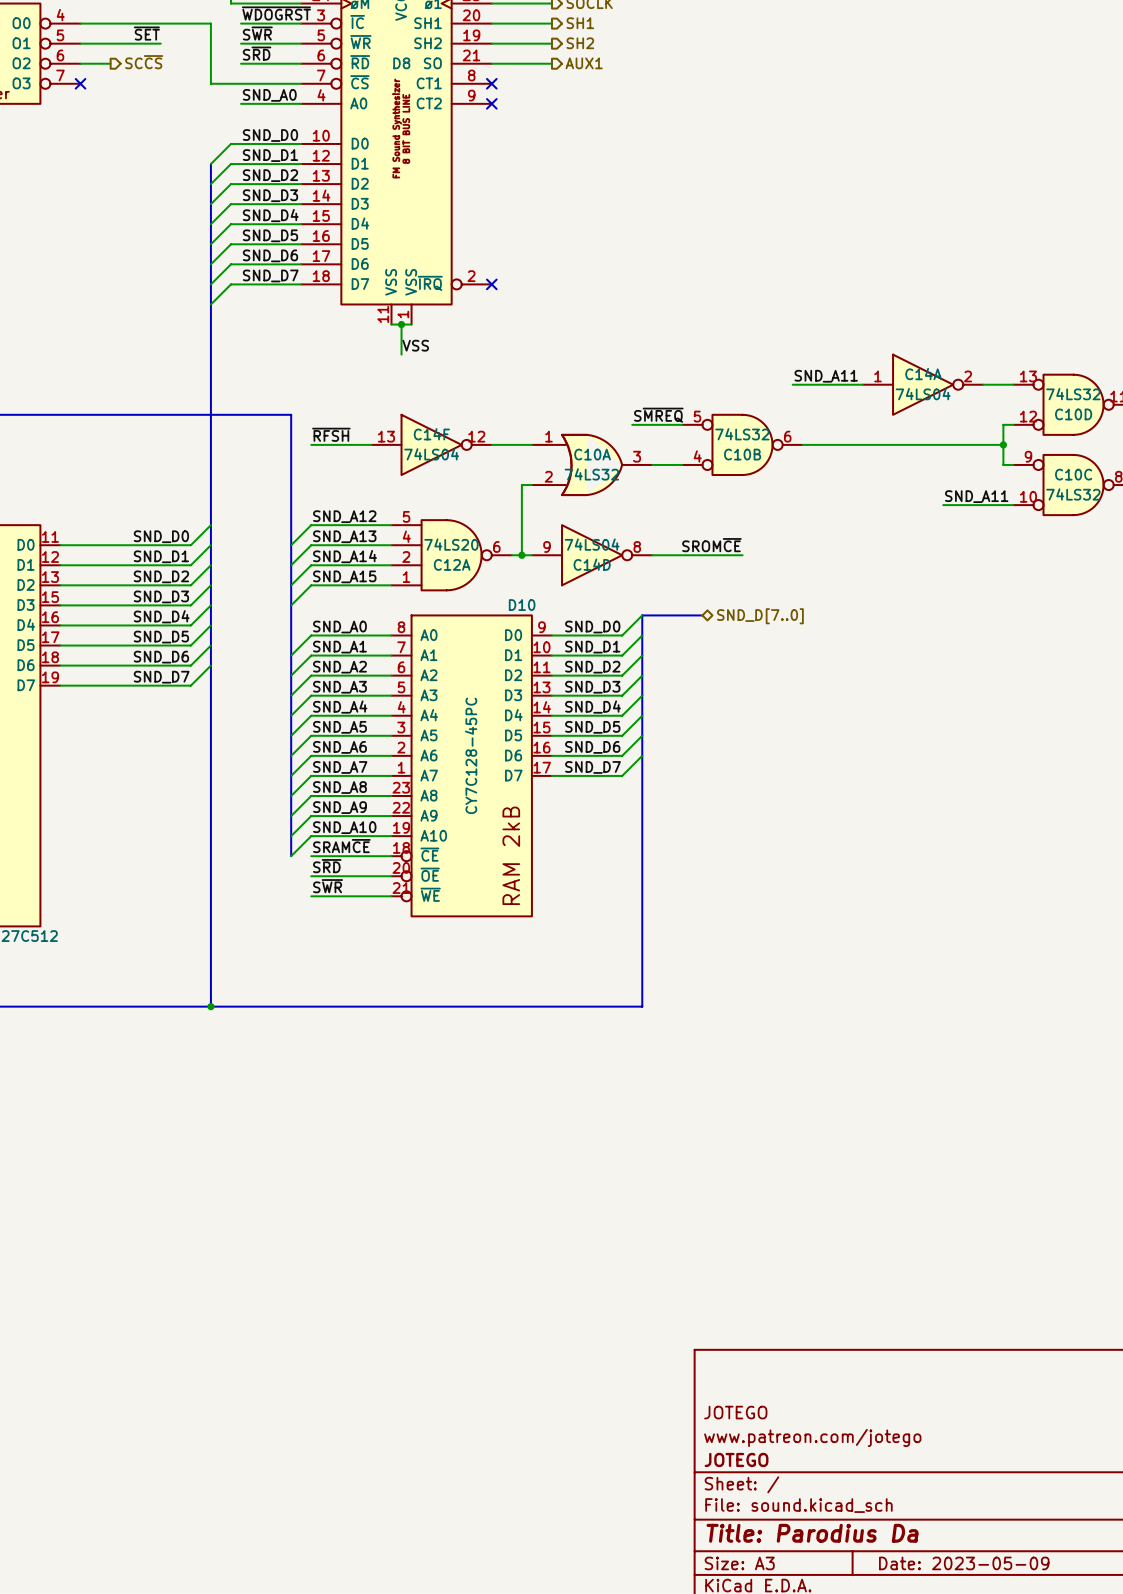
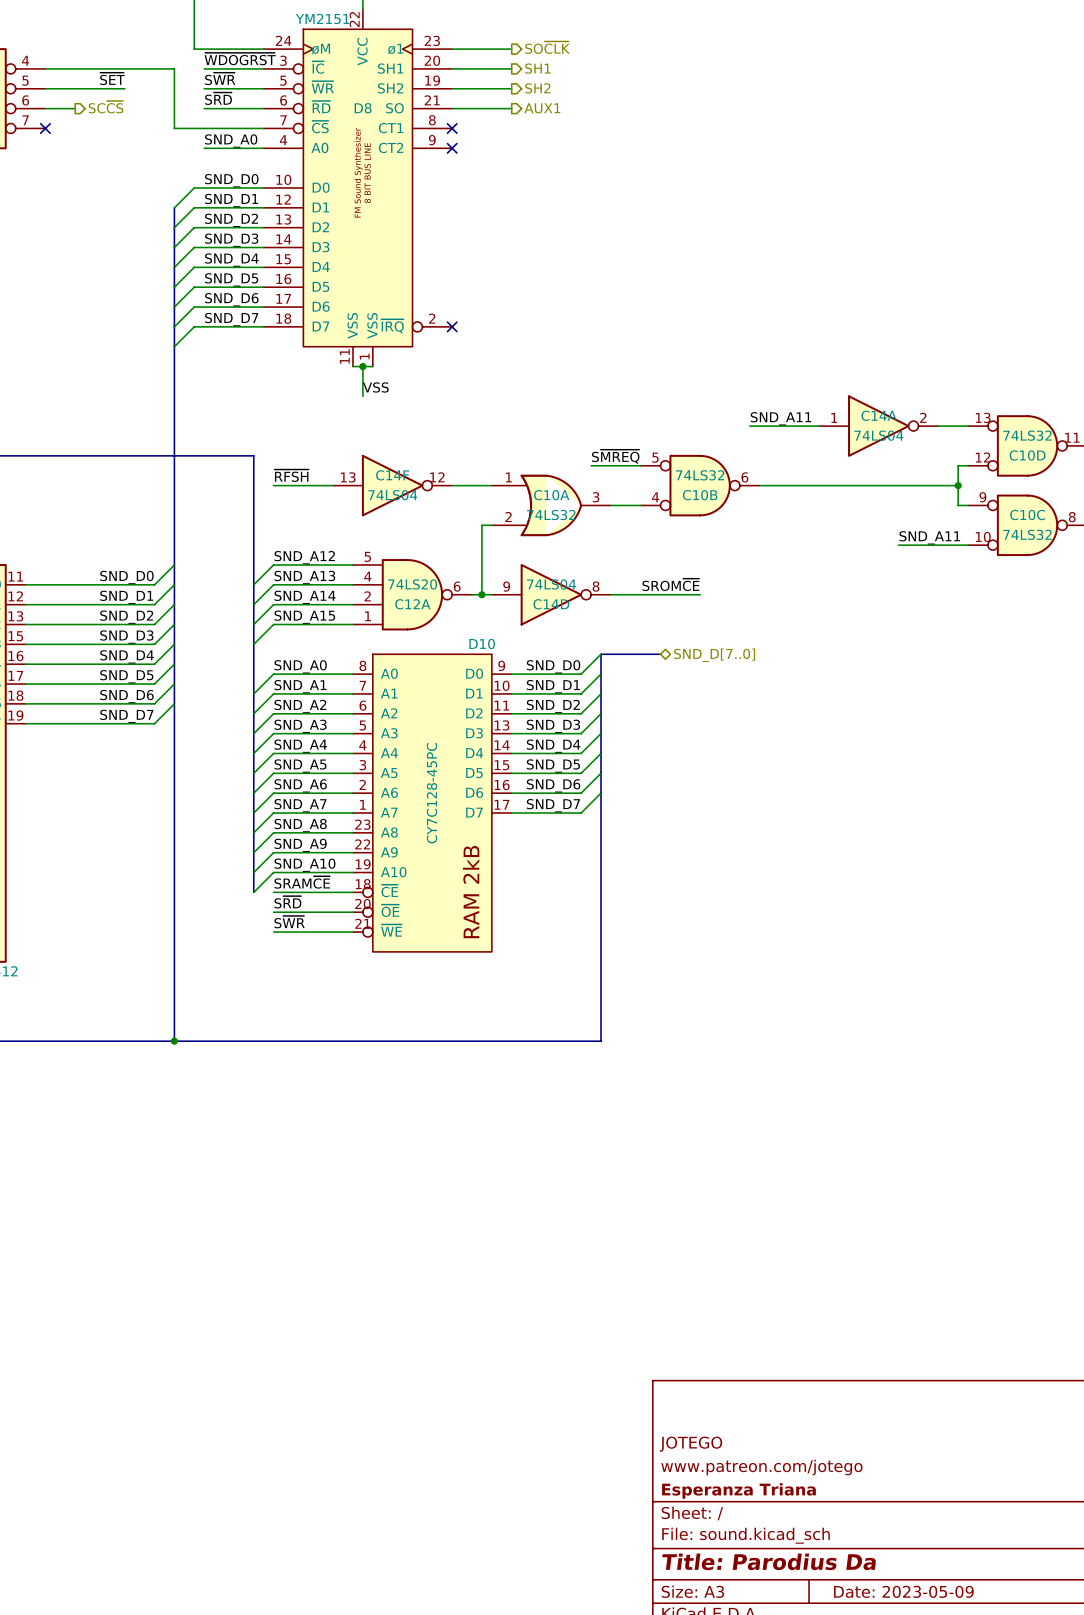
title block: JOTEGO (736, 1459) -> Esperanza Triana (738, 1490)

